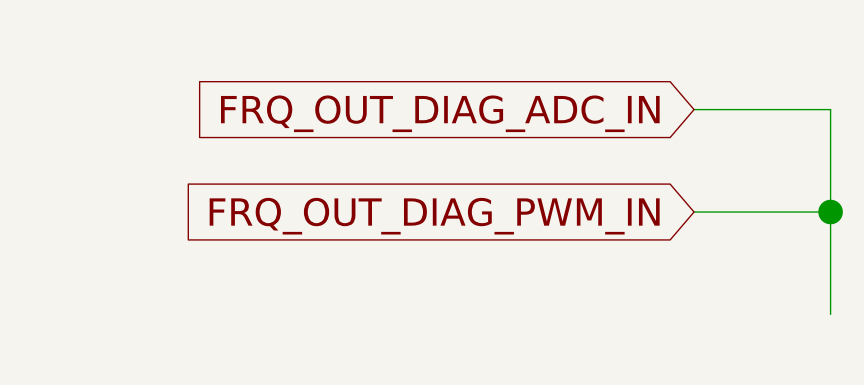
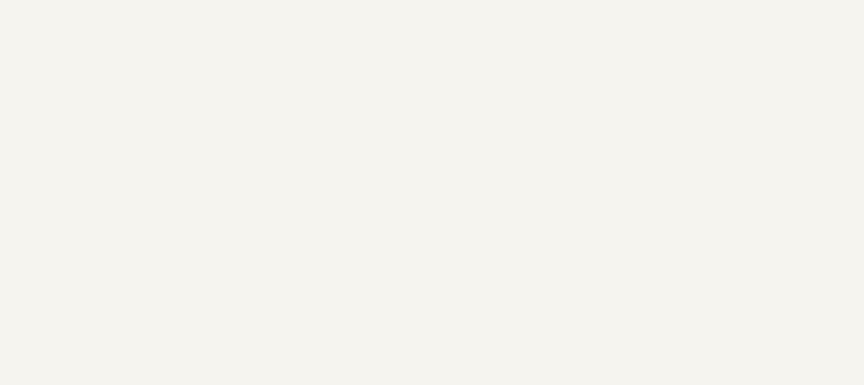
wire: (694, 109) (830, 109) (830, 314) -> none
global label: FRQ_OUT_DIAG_ADC_IN (440, 113) -> none
wire: (694, 212) (830, 212) -> none
junction: (830, 212) -> none
global label: FRQ_OUT_DIAG_PWM_IN (434, 216) -> none

